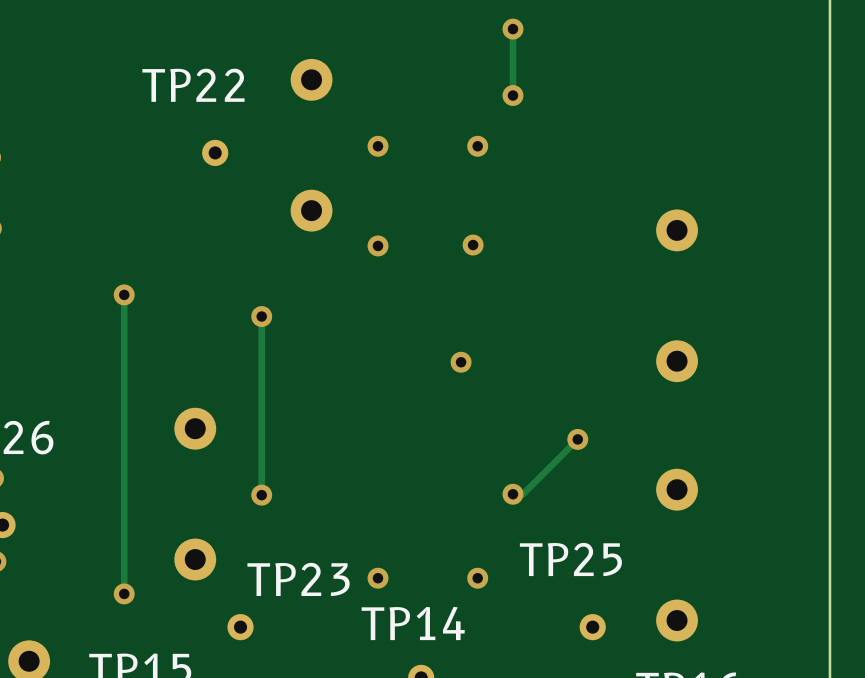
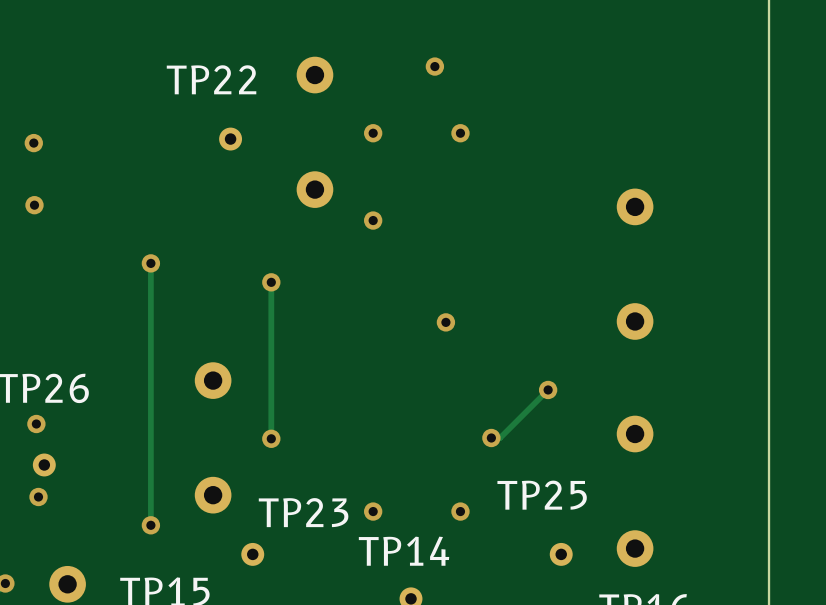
track: (512, 29) (512, 95) -> none
via: (512, 29) -> none
via: none -> (434, 66)
via: (512, 95) -> none
via: (473, 245) -> none

